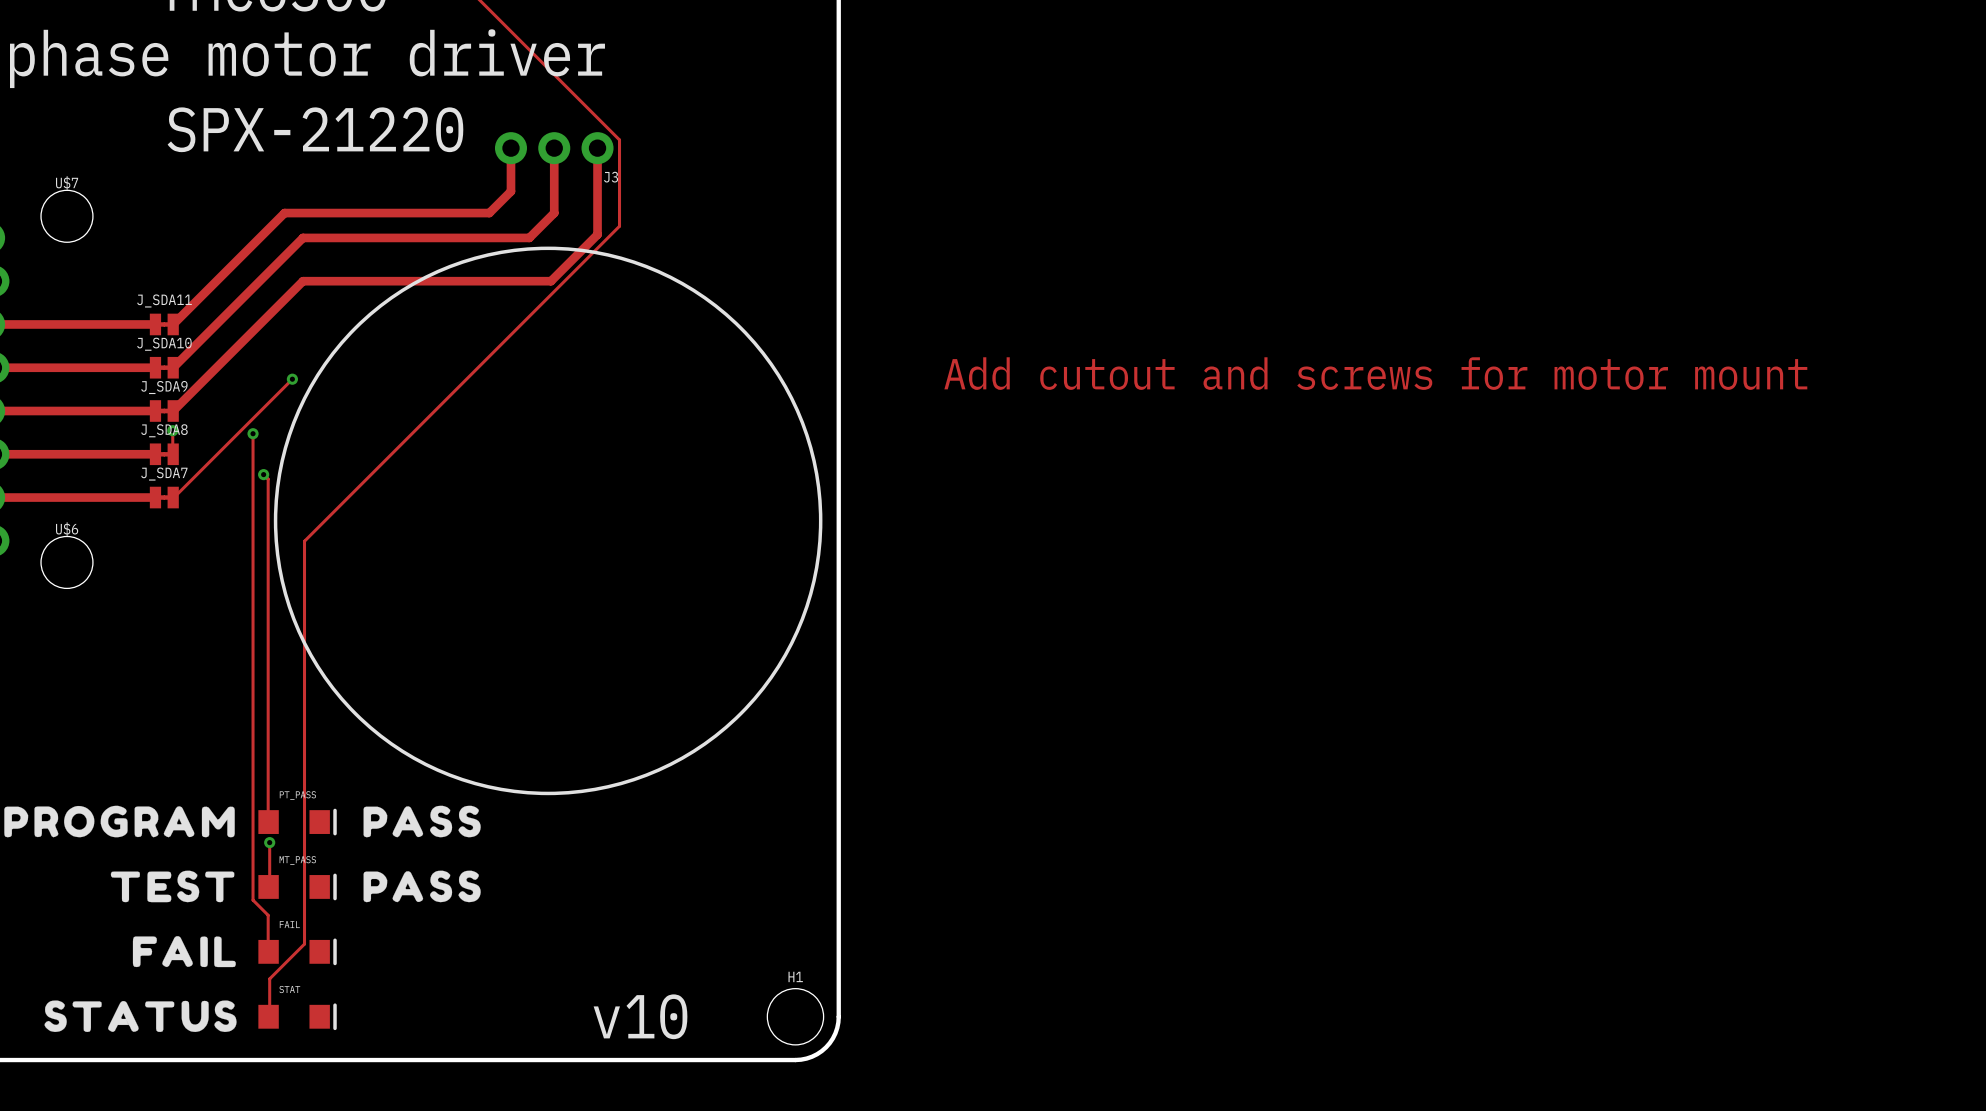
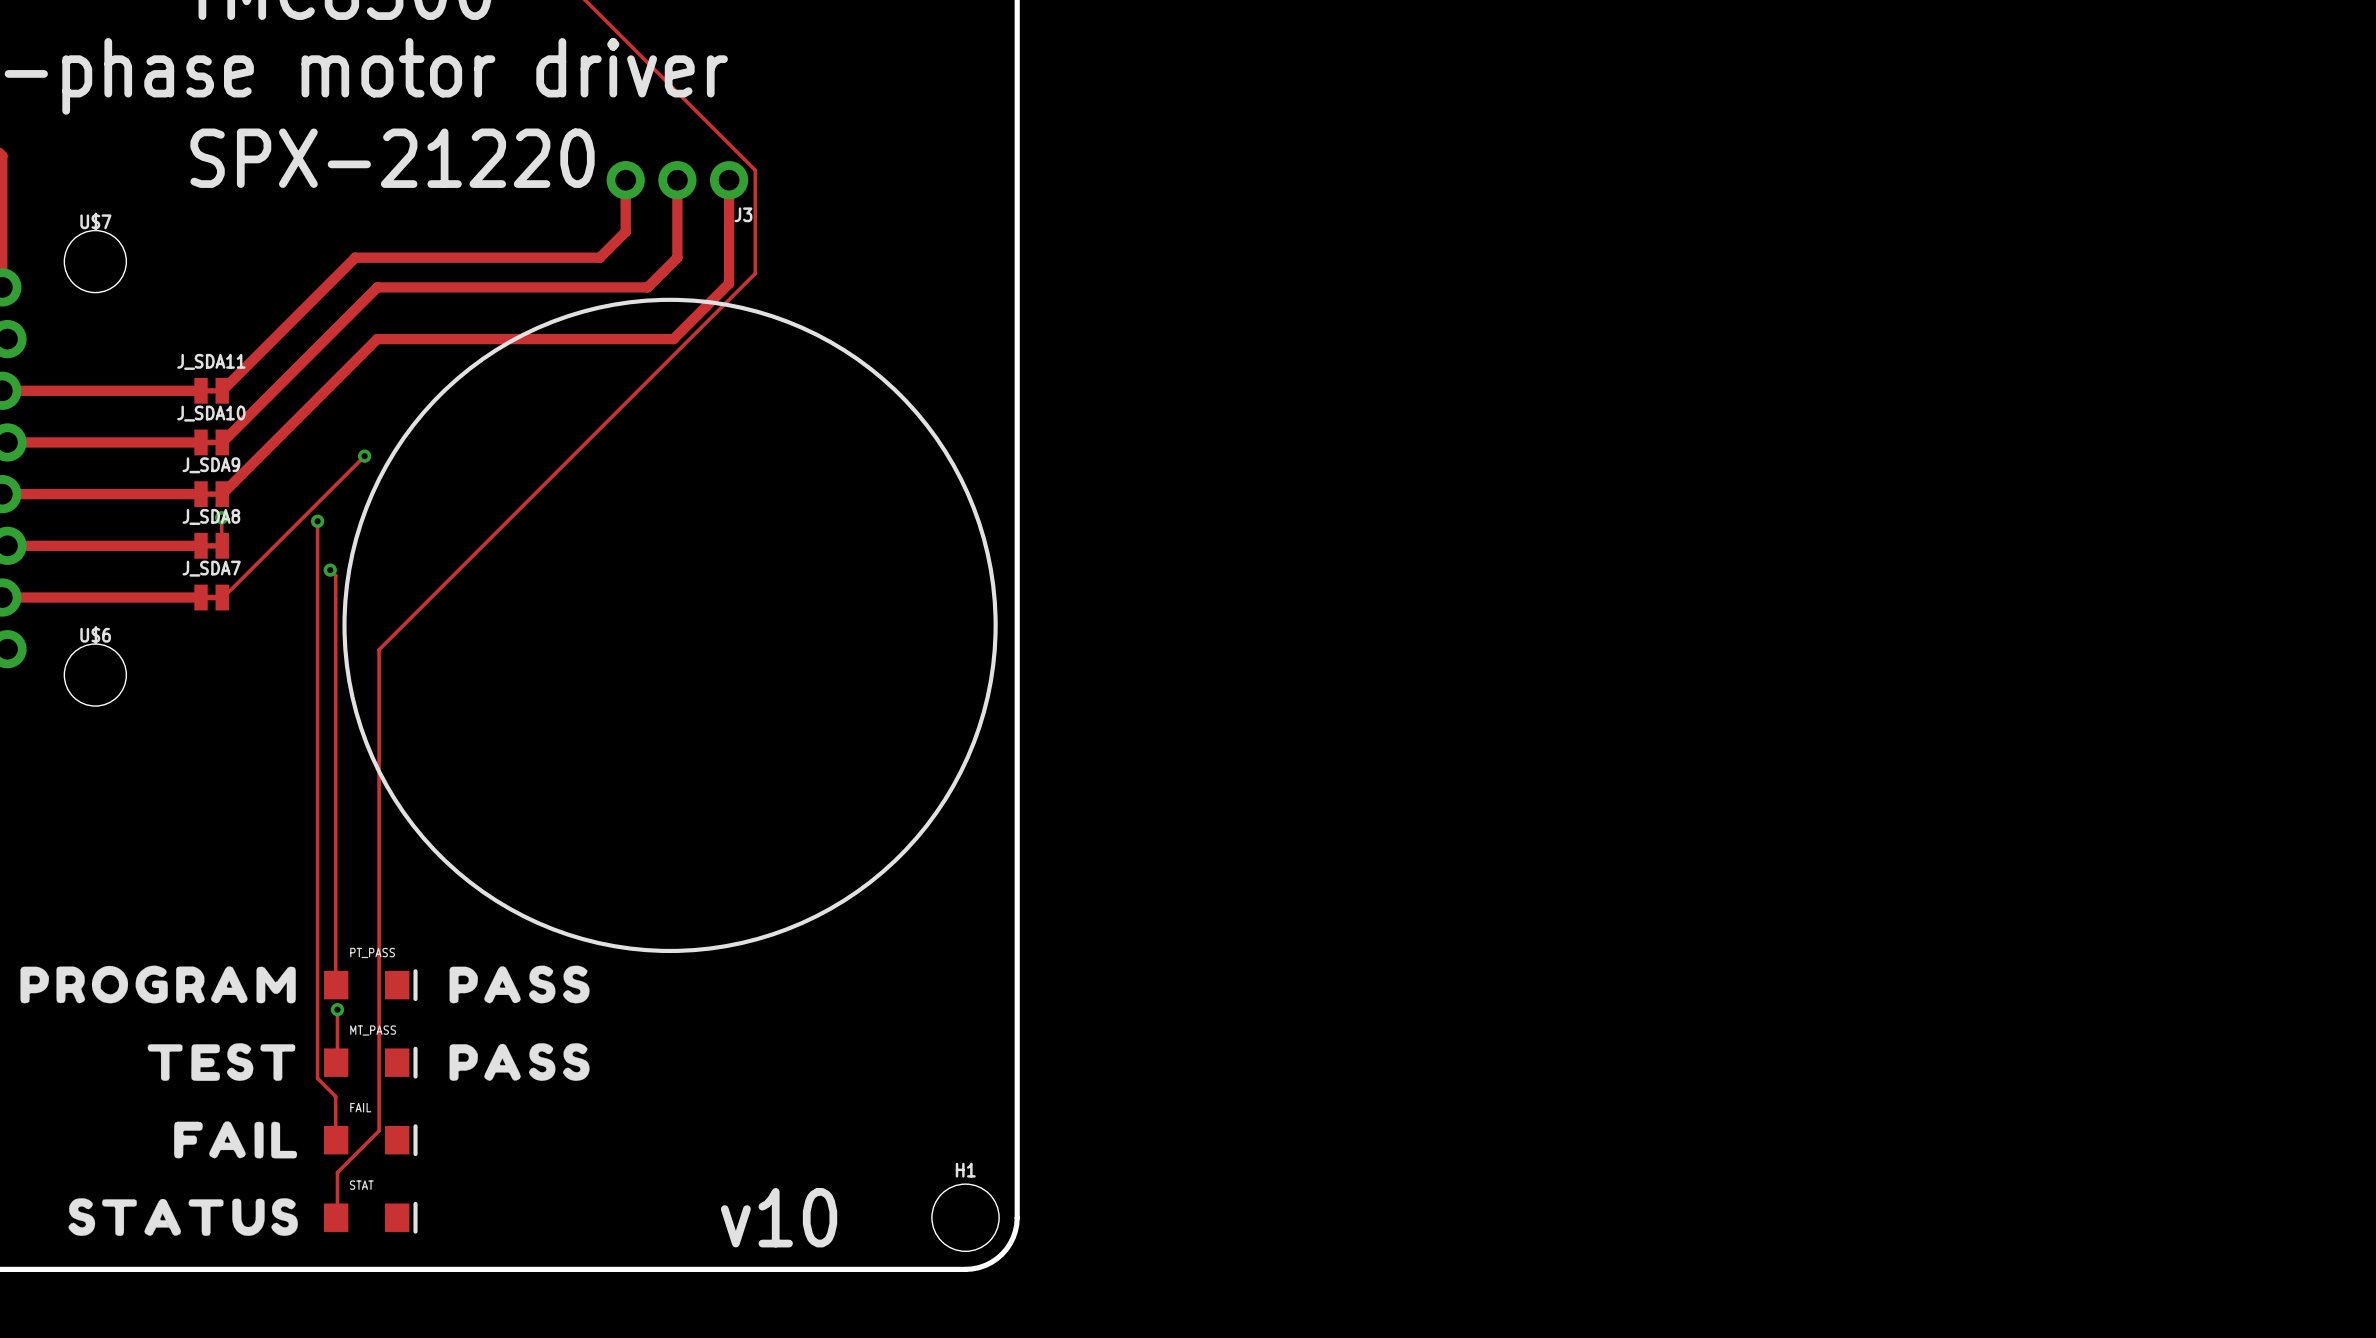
text: Add cutout and screws for motor mount (1375, 373) -> none

